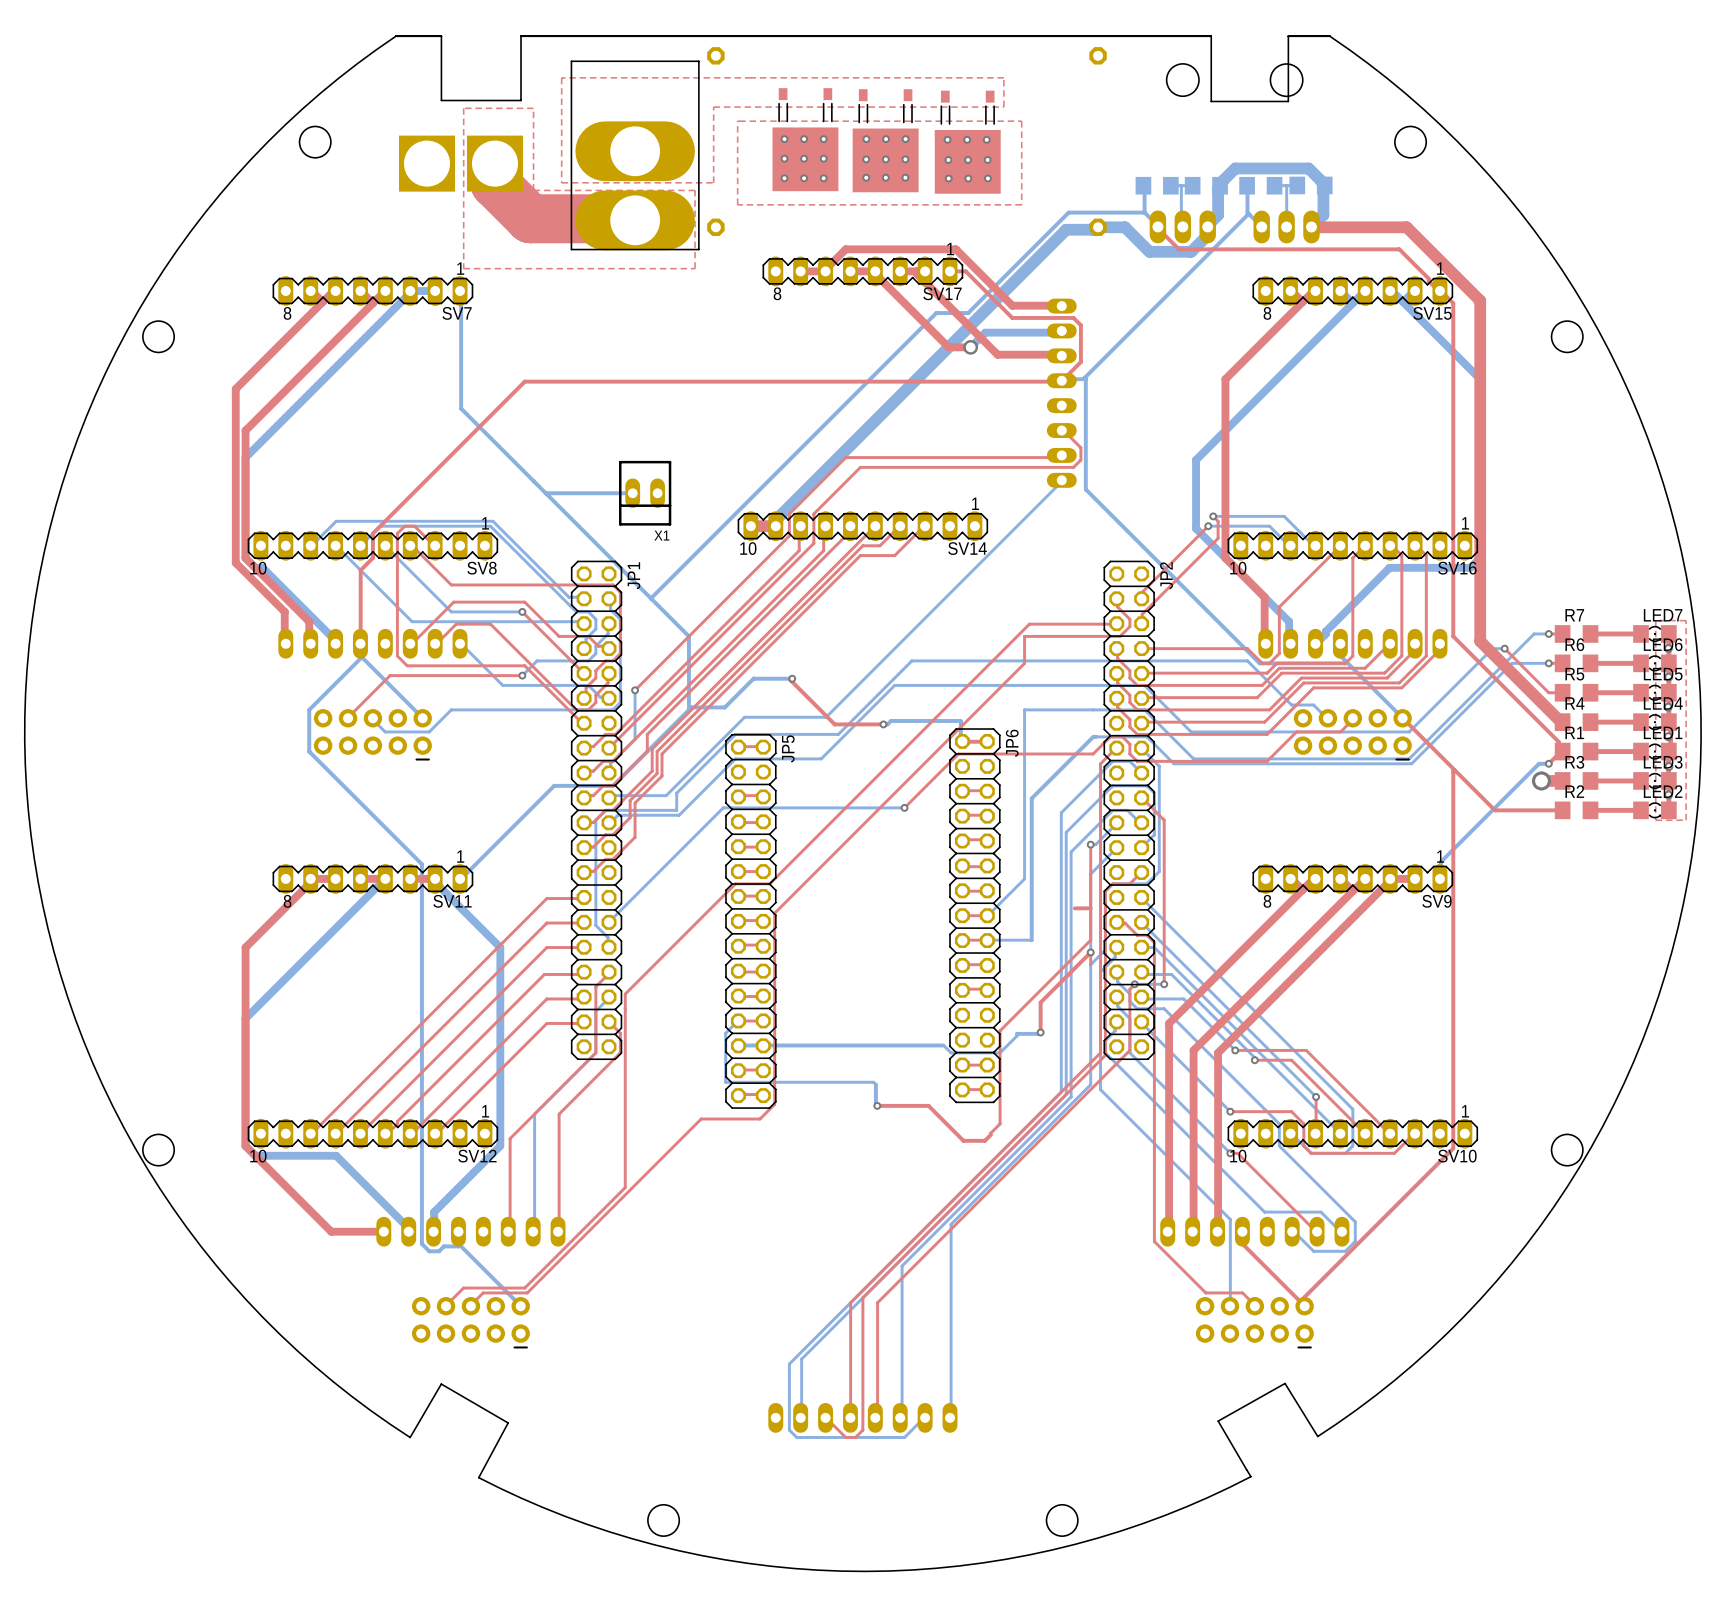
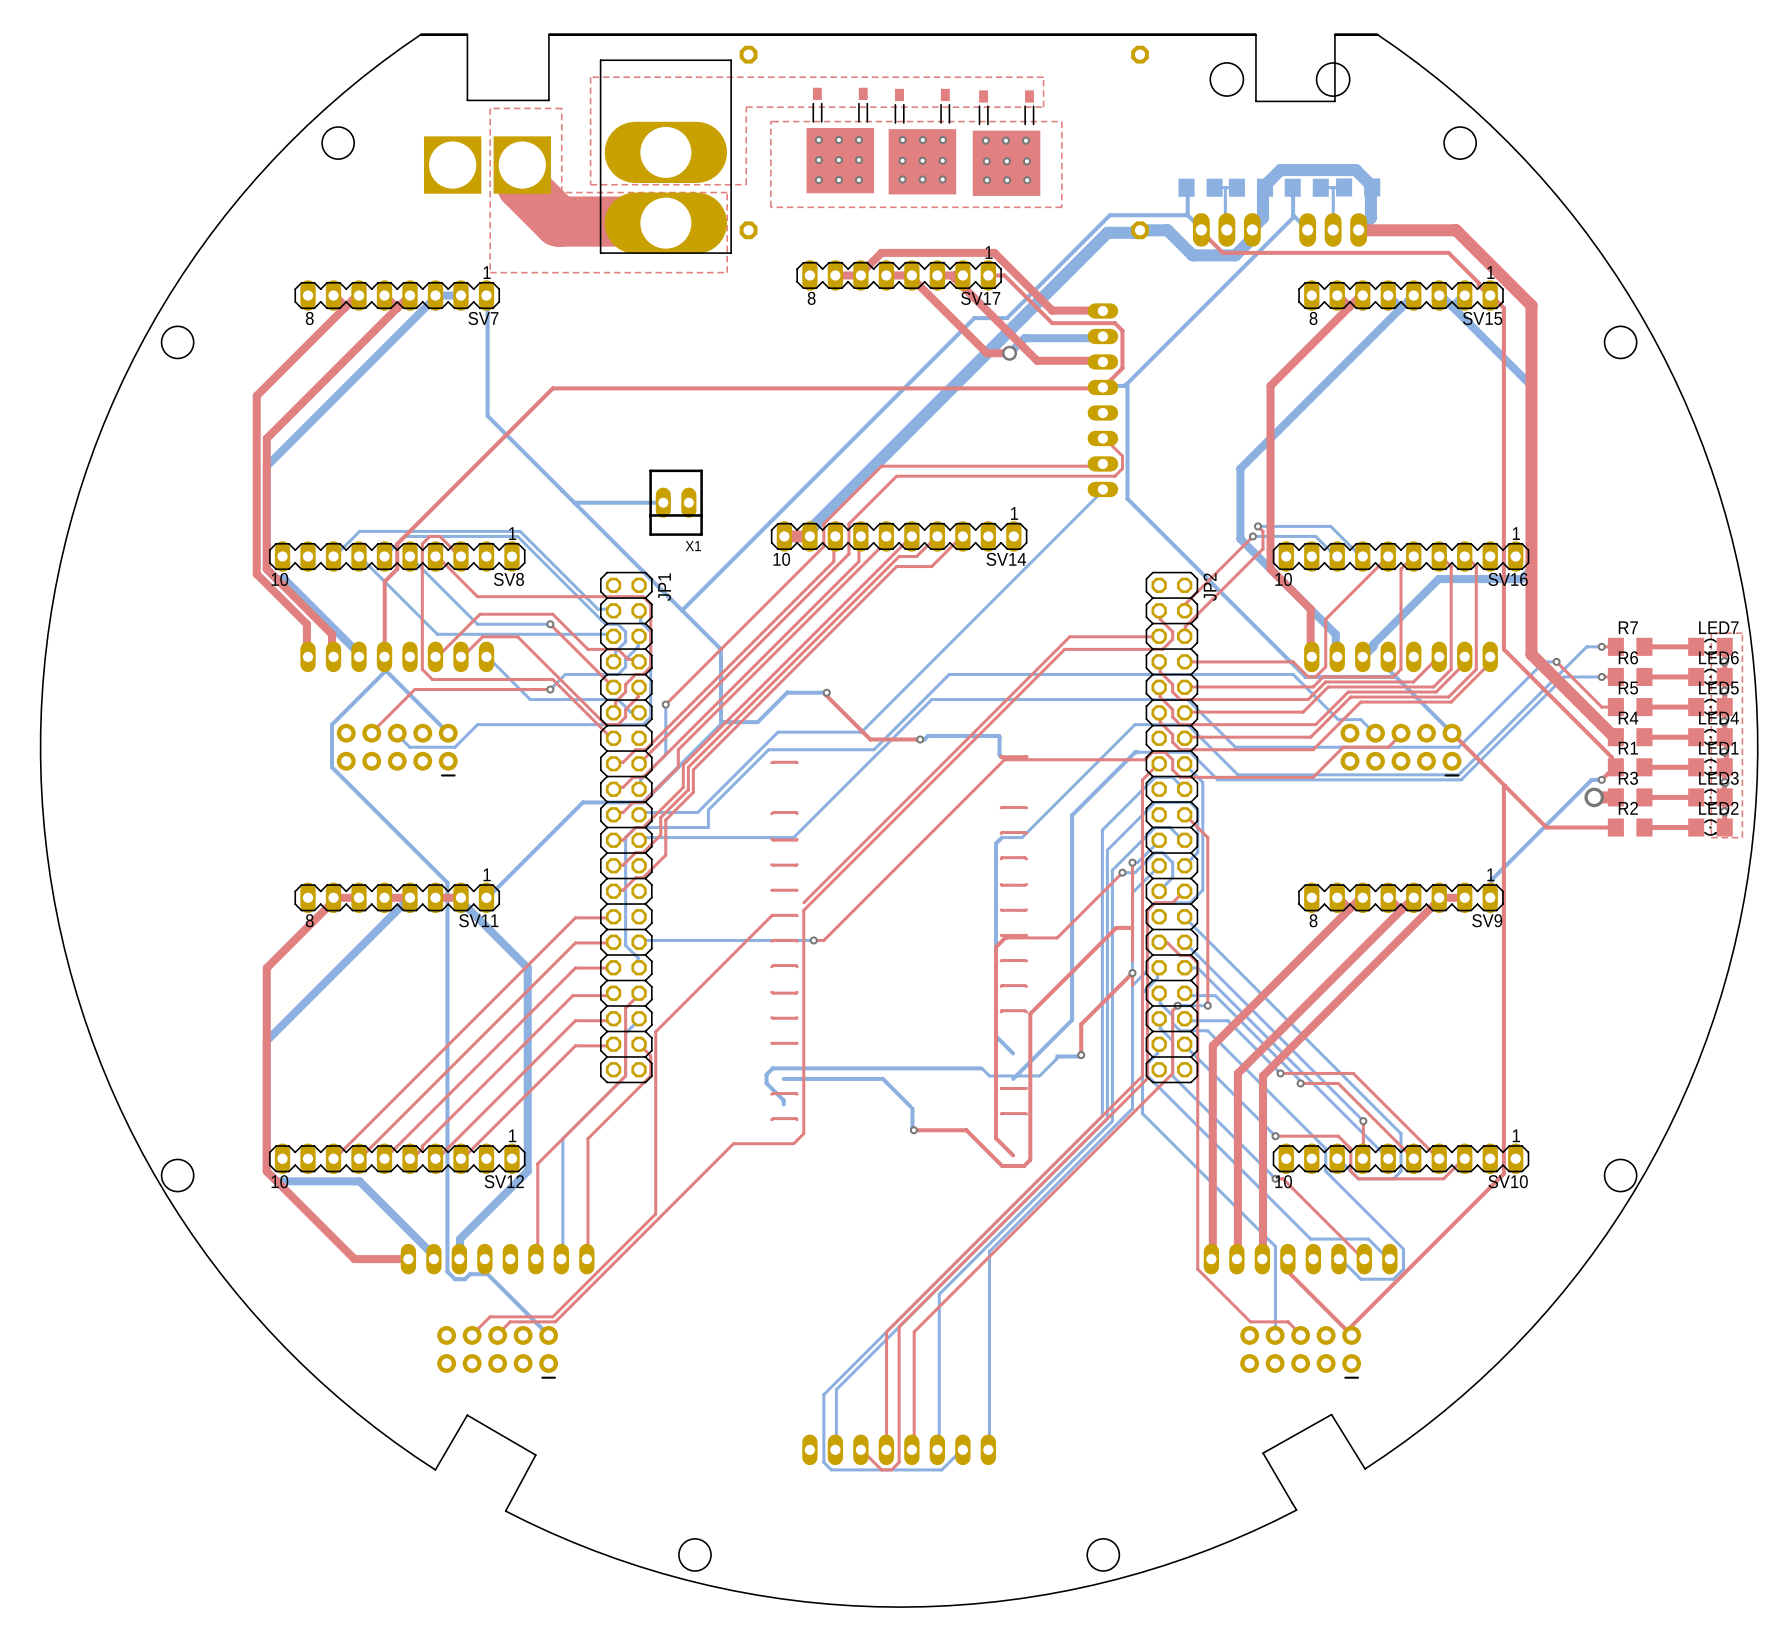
top track: (1024, 636) (1024, 663) (774, 913) (774, 1104) (769, 1109) -> (1064, 649) (803, 910) (803, 1133)
bottom track: (1093, 709) (1024, 709) (1024, 878) (987, 915) -> (1135, 724) (1022, 837) (1002, 837) (996, 843) (996, 1036) (1013, 1053)
top track: (1102, 744) (1093, 754) (958, 754) (904, 807) -> (1145, 759) (1004, 759) (823, 940) (813, 940)
bottom track: (821, 758) (735, 758) (679, 815) (617, 815) (609, 822) -> (856, 774) (793, 837) (643, 837)
bottom track: (904, 807) (723, 807) (610, 920) -> (813, 940) (640, 940)
via: (904, 807) -> none
bottom track: none -> (1122, 872) (1135, 872) (1155, 852) (1162, 852) (1172, 862) (1172, 877) (1160, 890)
top track: none -> (1122, 872) (1057, 937) (1005, 937) (996, 947) (996, 1138) (1013, 1155)
via: none -> (1122, 872)
top track: (769, 883) (735, 883) (625, 994) (625, 1009) -> (773, 915) (655, 1031)
JP6: (974, 915) -> none
via: none -> (813, 940)
JP5: (750, 921) -> none
bottom track: (1031, 940) (987, 940) -> (1072, 960) (1072, 1020) (1013, 1078)
top track: (1090, 940) (1000, 1030) (1000, 1123) (990, 1134) -> (1116, 927) (1030, 1013) (1030, 1159)
bottom track: (738, 1020) (725, 1033) (725, 1082) (873, 1082) -> (783, 1078) (882, 1078) (910, 1106)
bottom track: none -> (772, 1068) (766, 1074) (766, 1083) (783, 1100) (783, 1104)

